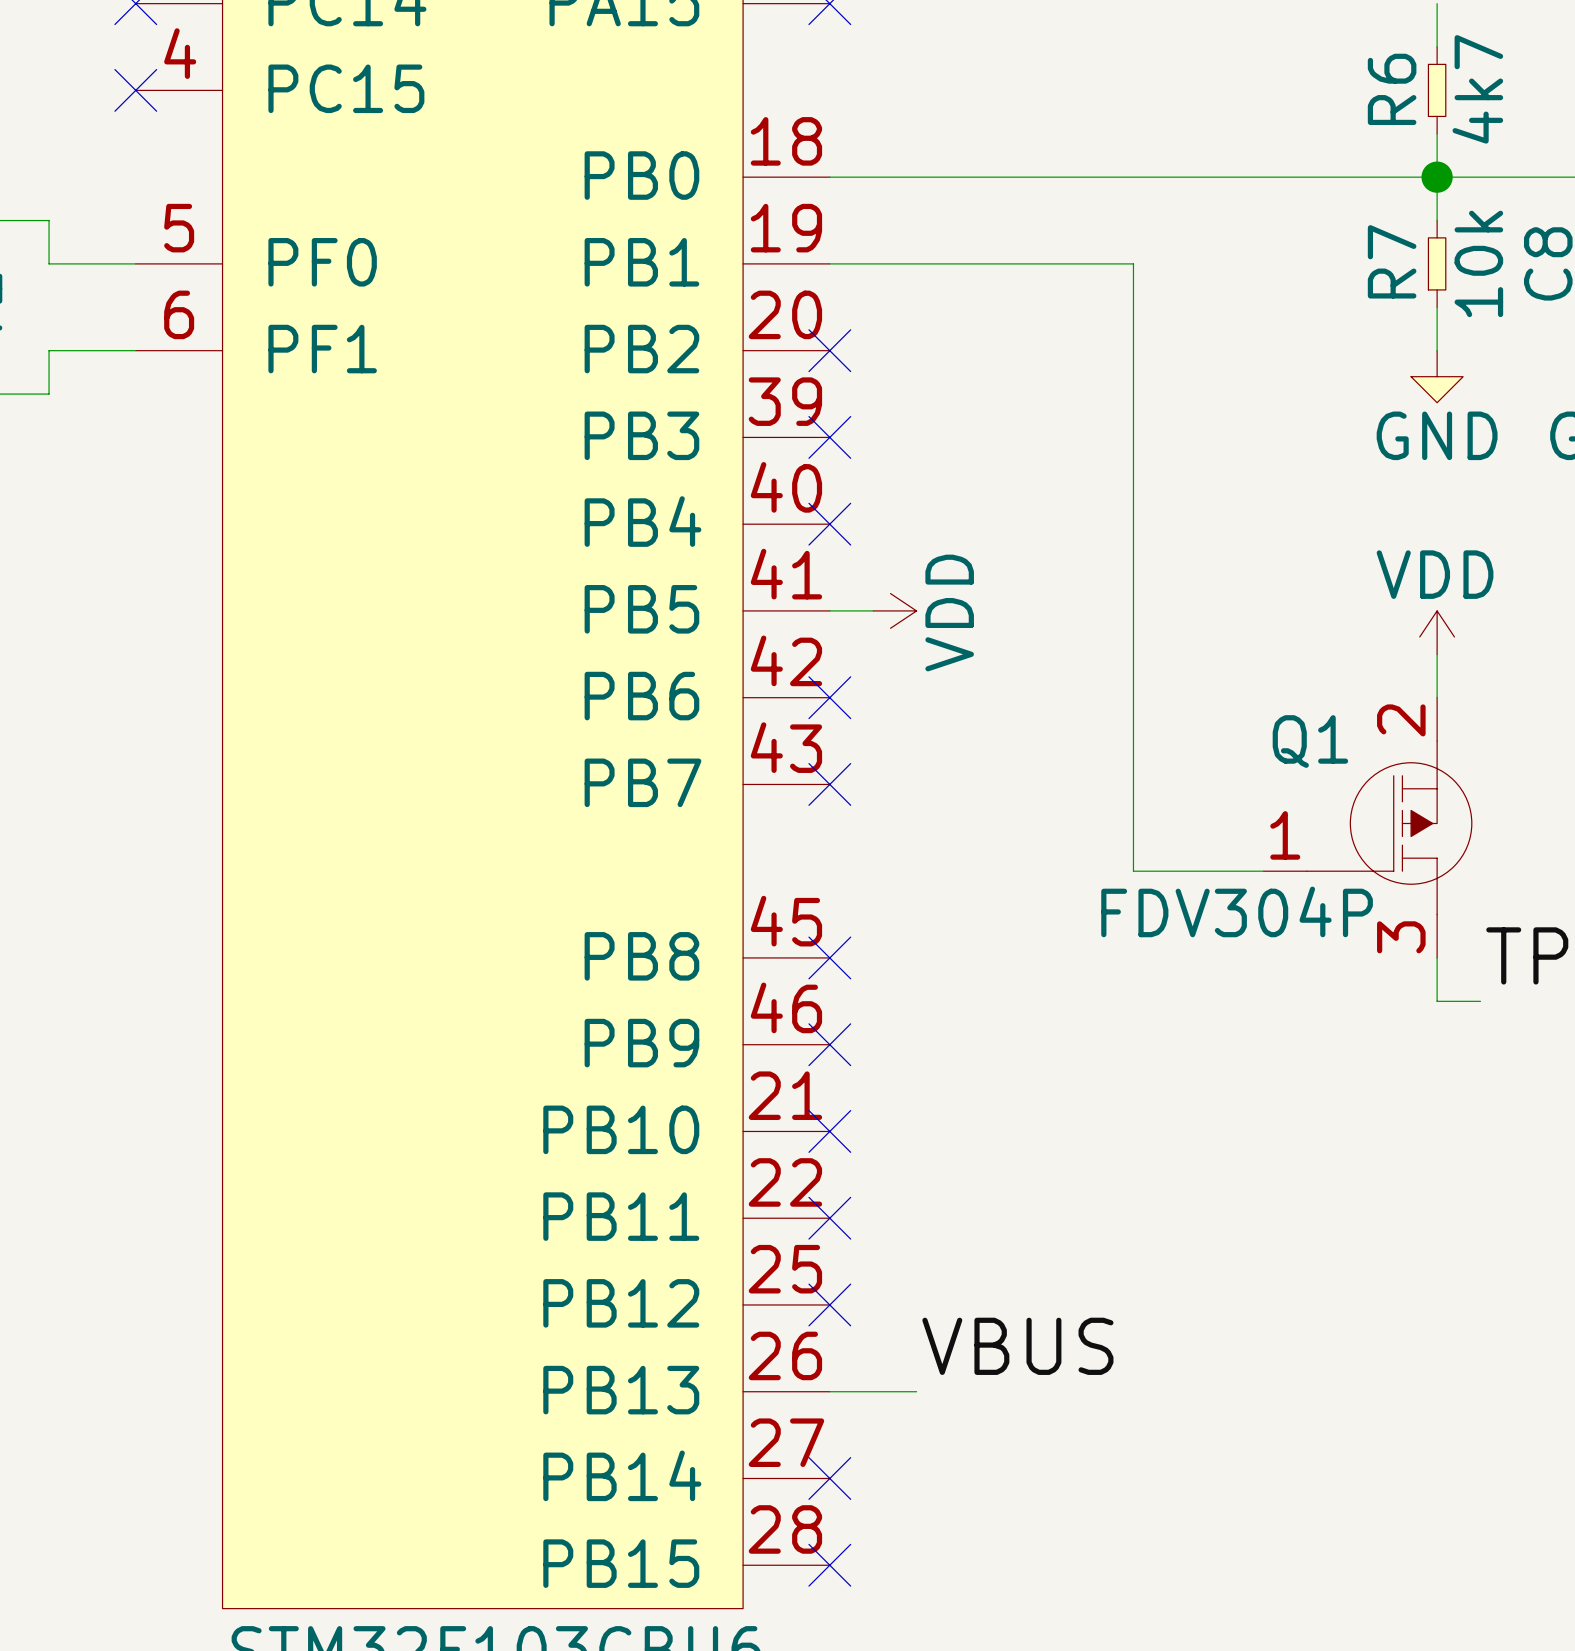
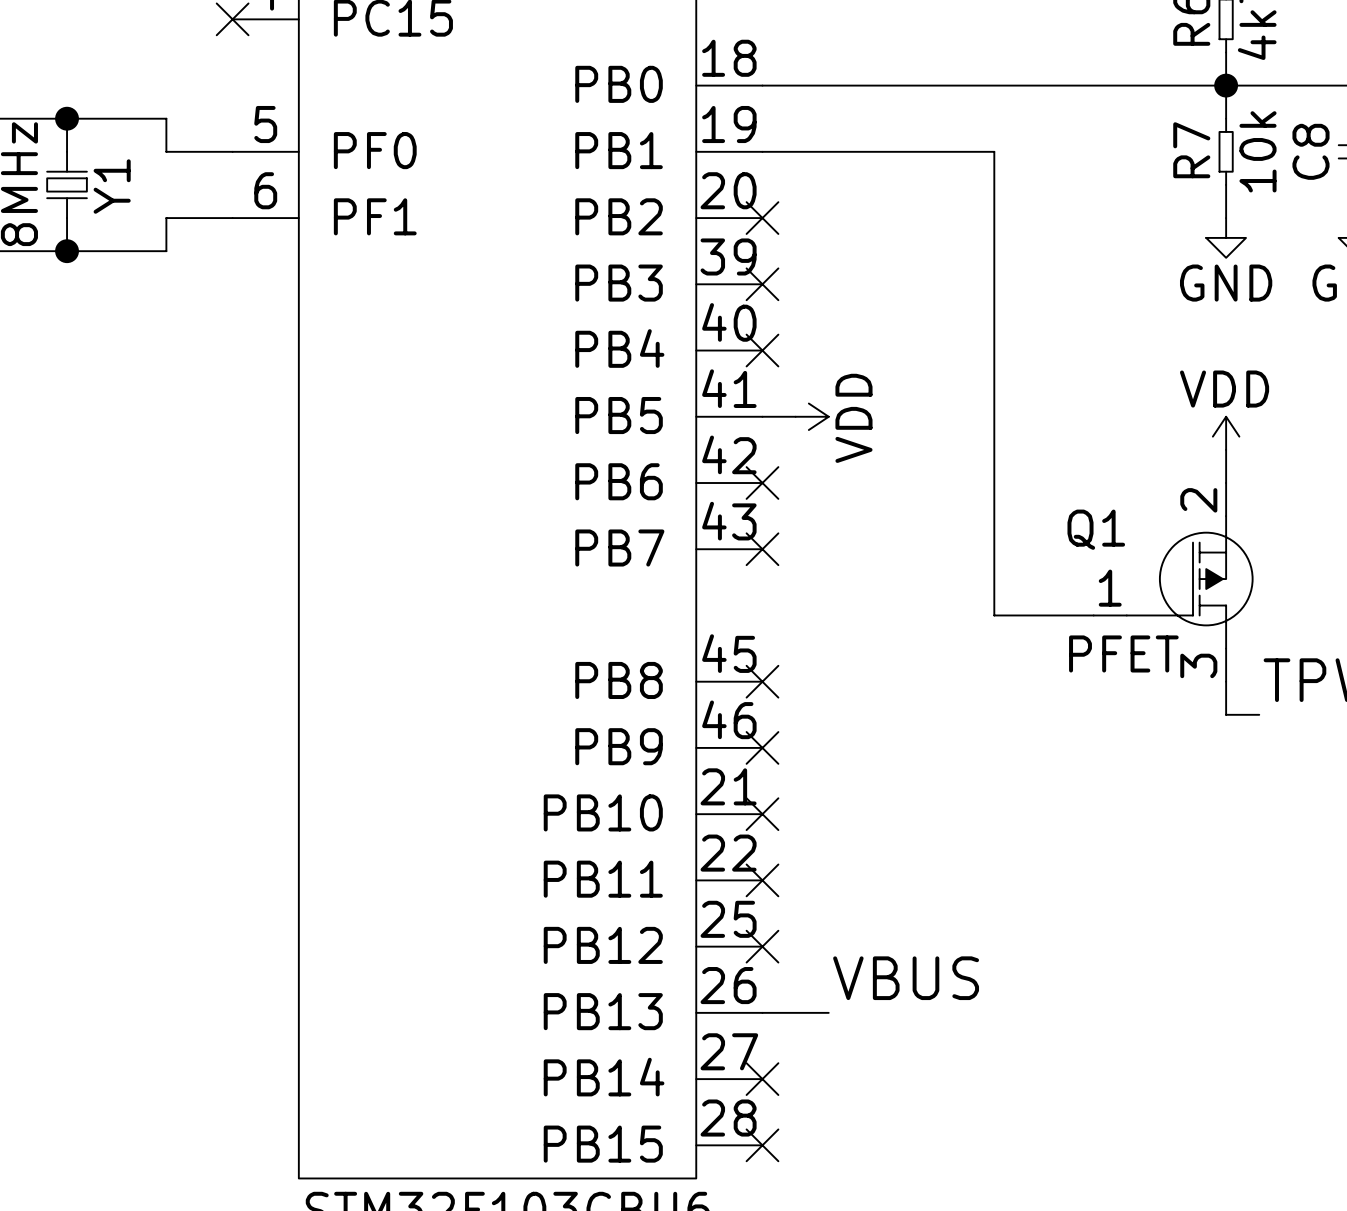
Q1 name position: Q1 (1310, 741) -> Q1 (1096, 529)
Q1 value: FDV304P (1237, 911) -> PFET (1123, 653)

